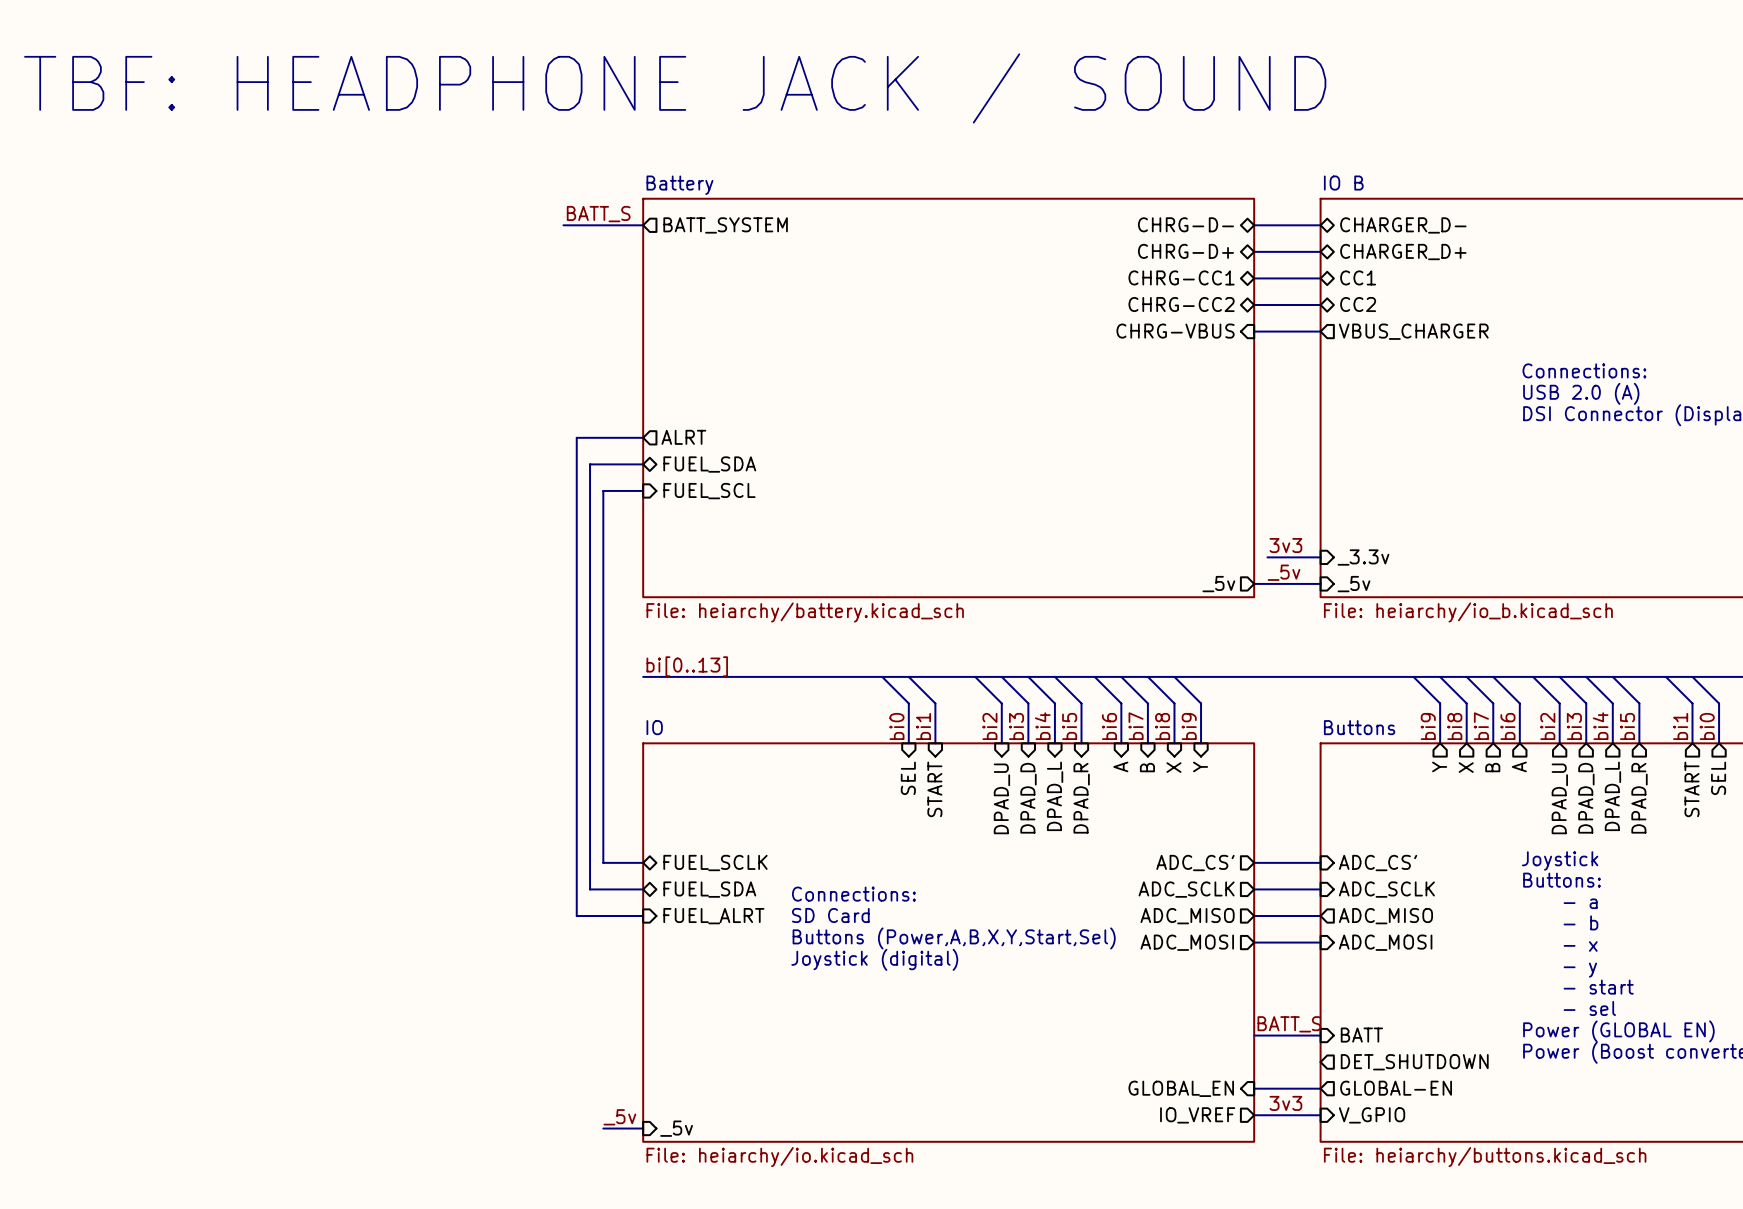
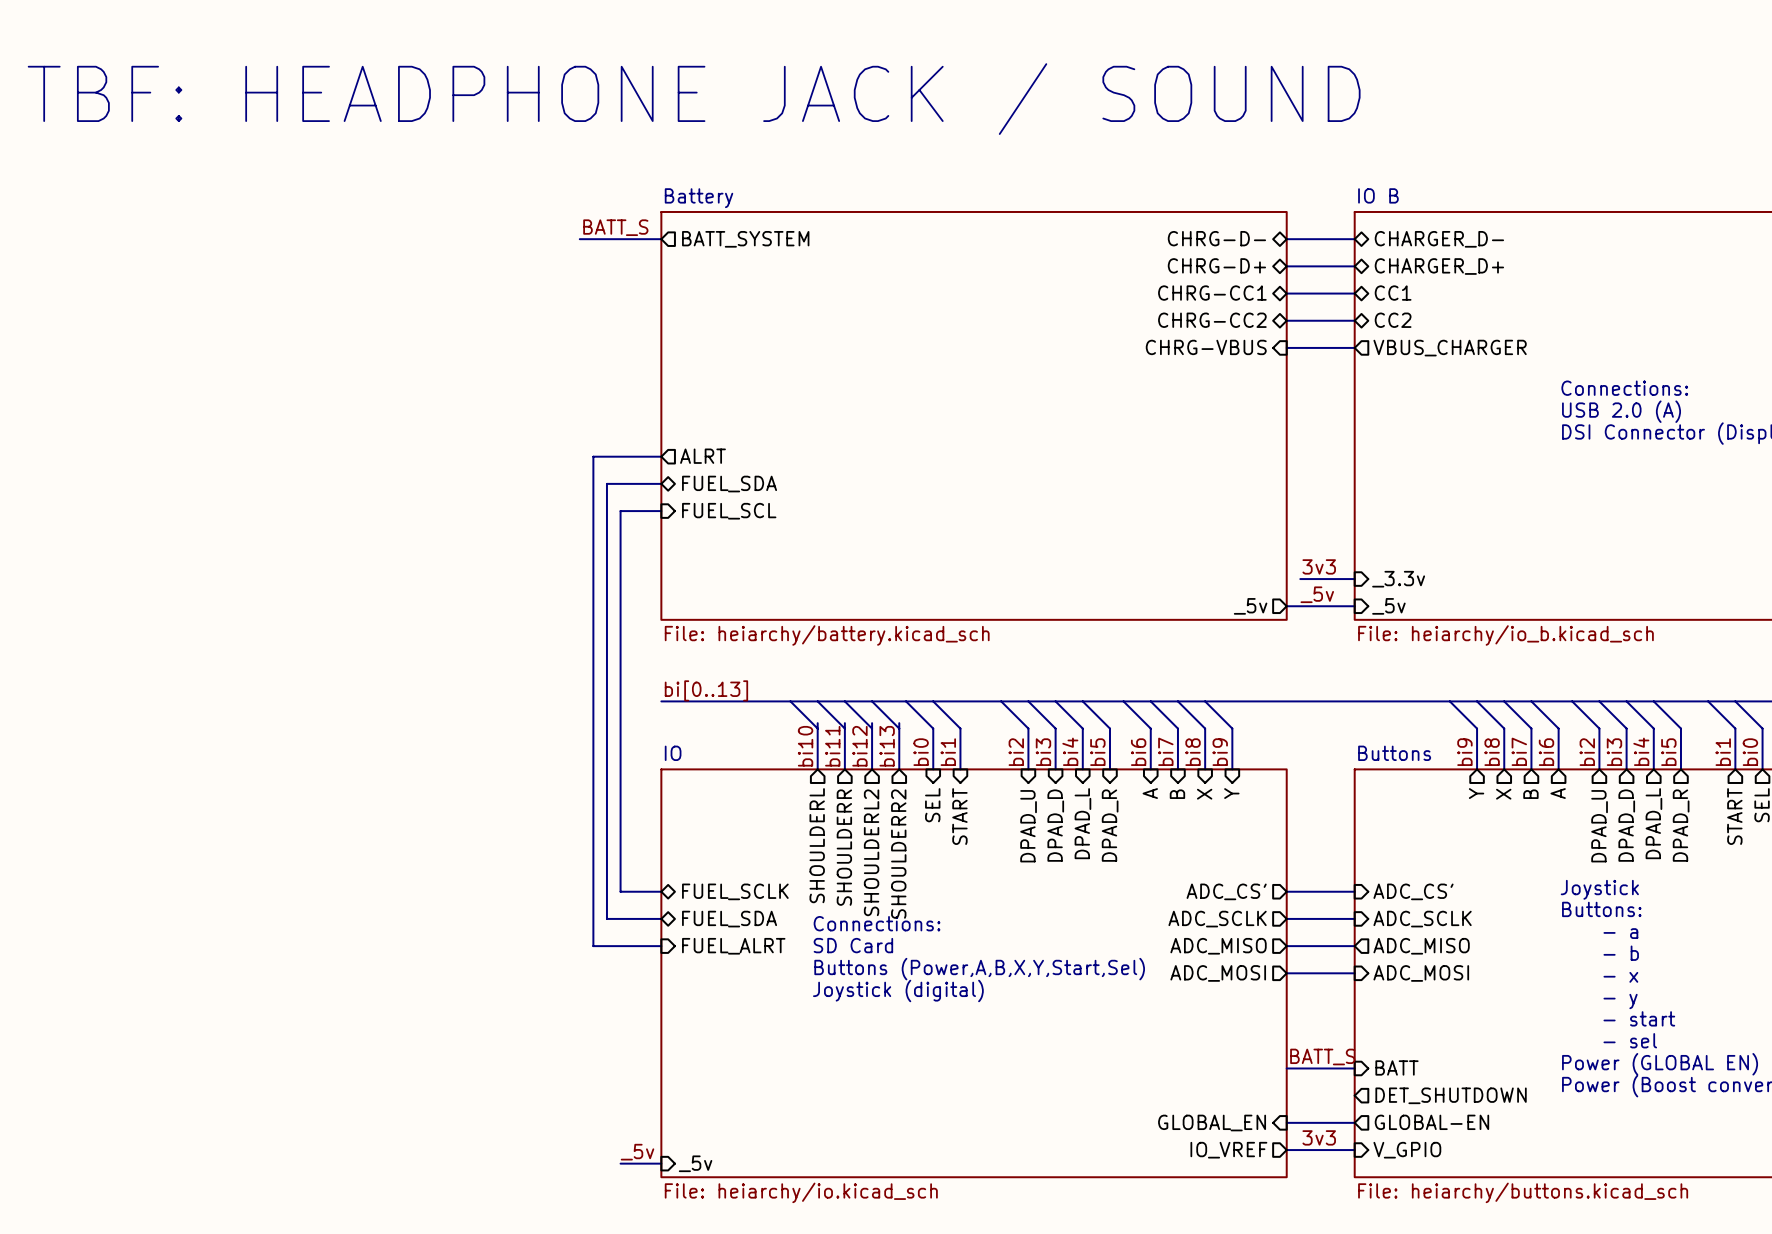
wire: none -> (790, 701) (817, 728)
wire: none -> (817, 701) (844, 728)
wire: none -> (844, 701) (872, 728)
wire: none -> (872, 701) (899, 728)
wire: none -> (817, 723) (817, 769)
wire: none -> (844, 723) (844, 769)
wire: none -> (872, 723) (872, 769)
wire: none -> (899, 723) (899, 769)
label: none -> bi10 (805, 746)
label: none -> bi11 (832, 746)
label: none -> bi12 (859, 746)
label: none -> bi13 (887, 746)
sheet pin: none -> SHOULDERL (817, 845)
sheet pin: none -> SHOULDERR (844, 847)
sheet pin: none -> SHOULDERL2 (871, 852)
sheet pin: none -> SHOULDERR2 (898, 854)

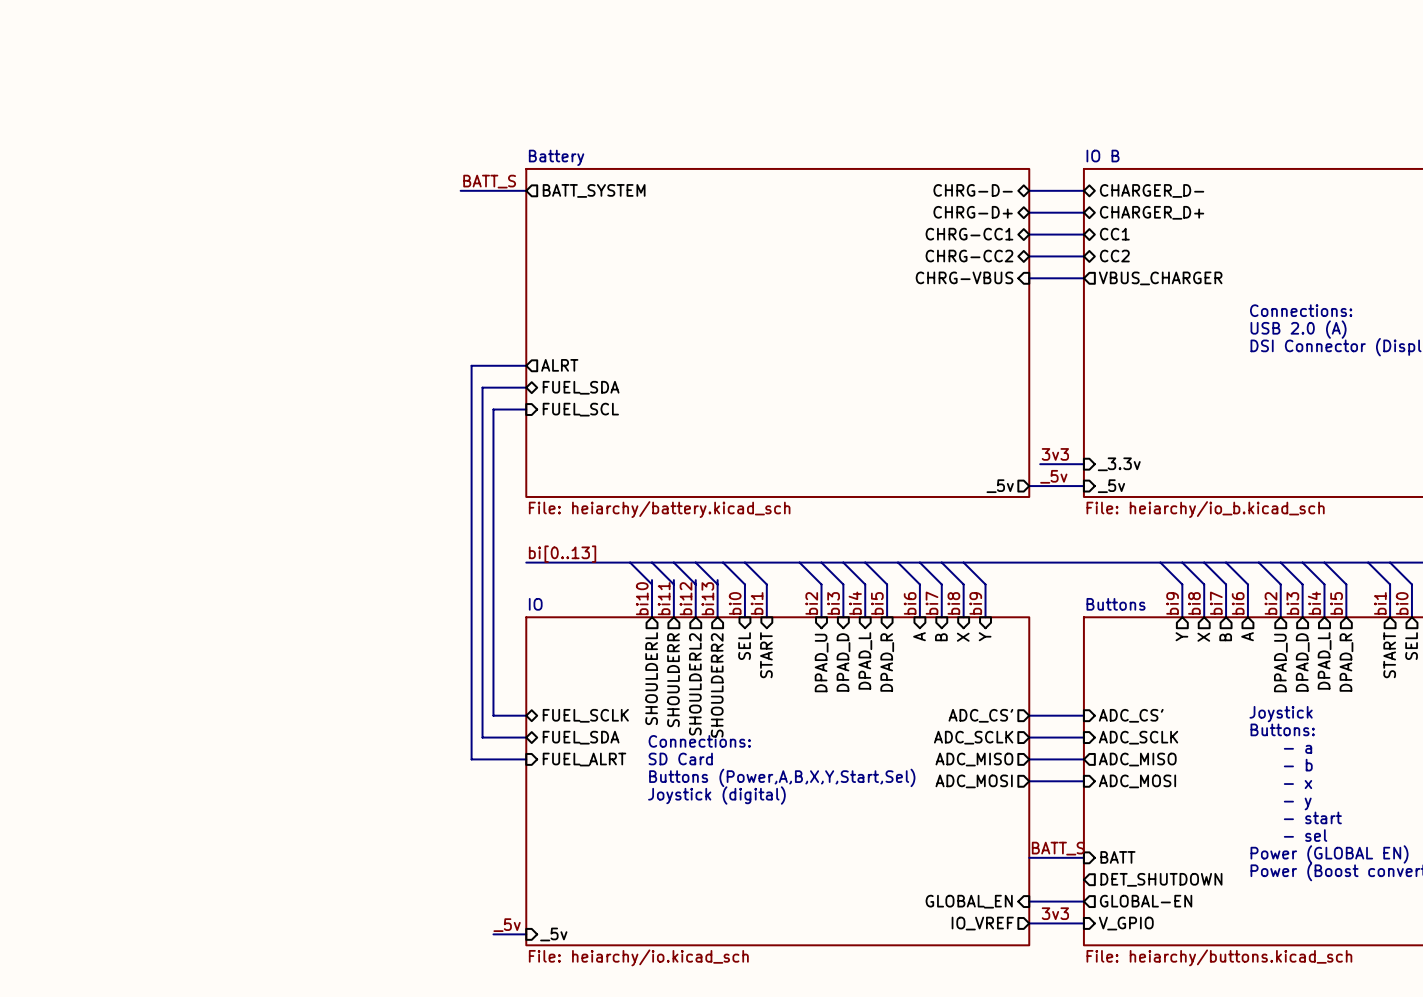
text: TBF: HEADPHONE JACK / SOUND (694, 99) -> none

